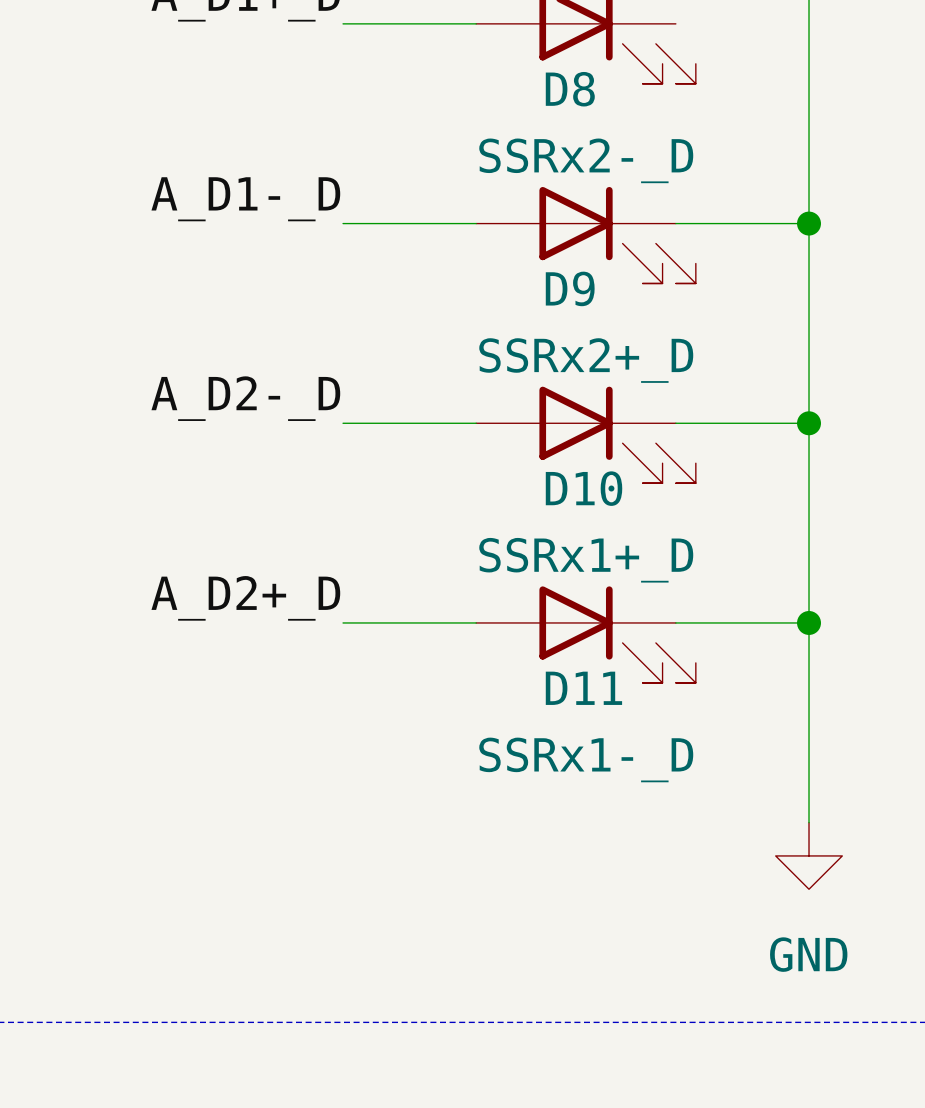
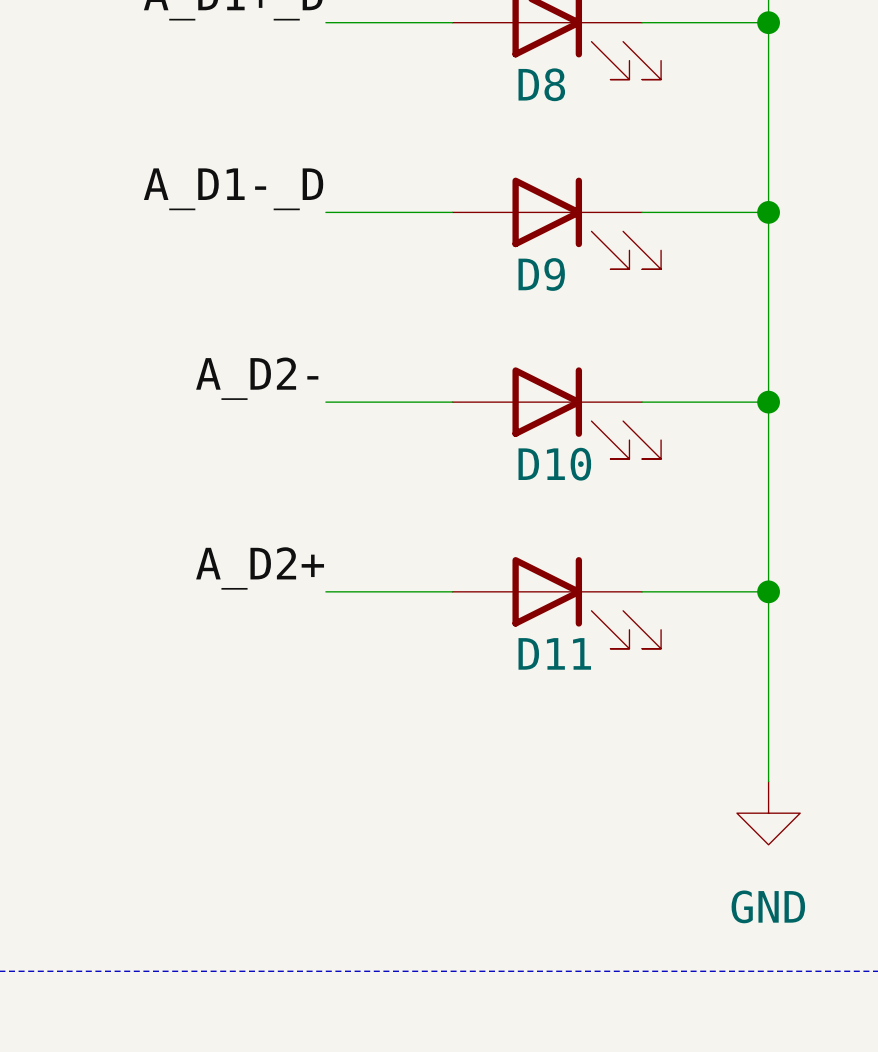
wire: none -> (642, 22) (768, 22)
junction: none -> (768, 22)
D8 value: SSRx2-_D (586, 160) -> none
D9 value: SSRx2+_D (586, 360) -> none
label: A_D2-_D (245, 398) -> A_D2- (257, 378)
D10 value: SSRx1+_D (586, 560) -> none
label: A_D2+_D (245, 598) -> A_D2+ (260, 568)
D11 value: SSRx1-_D (586, 759) -> none

